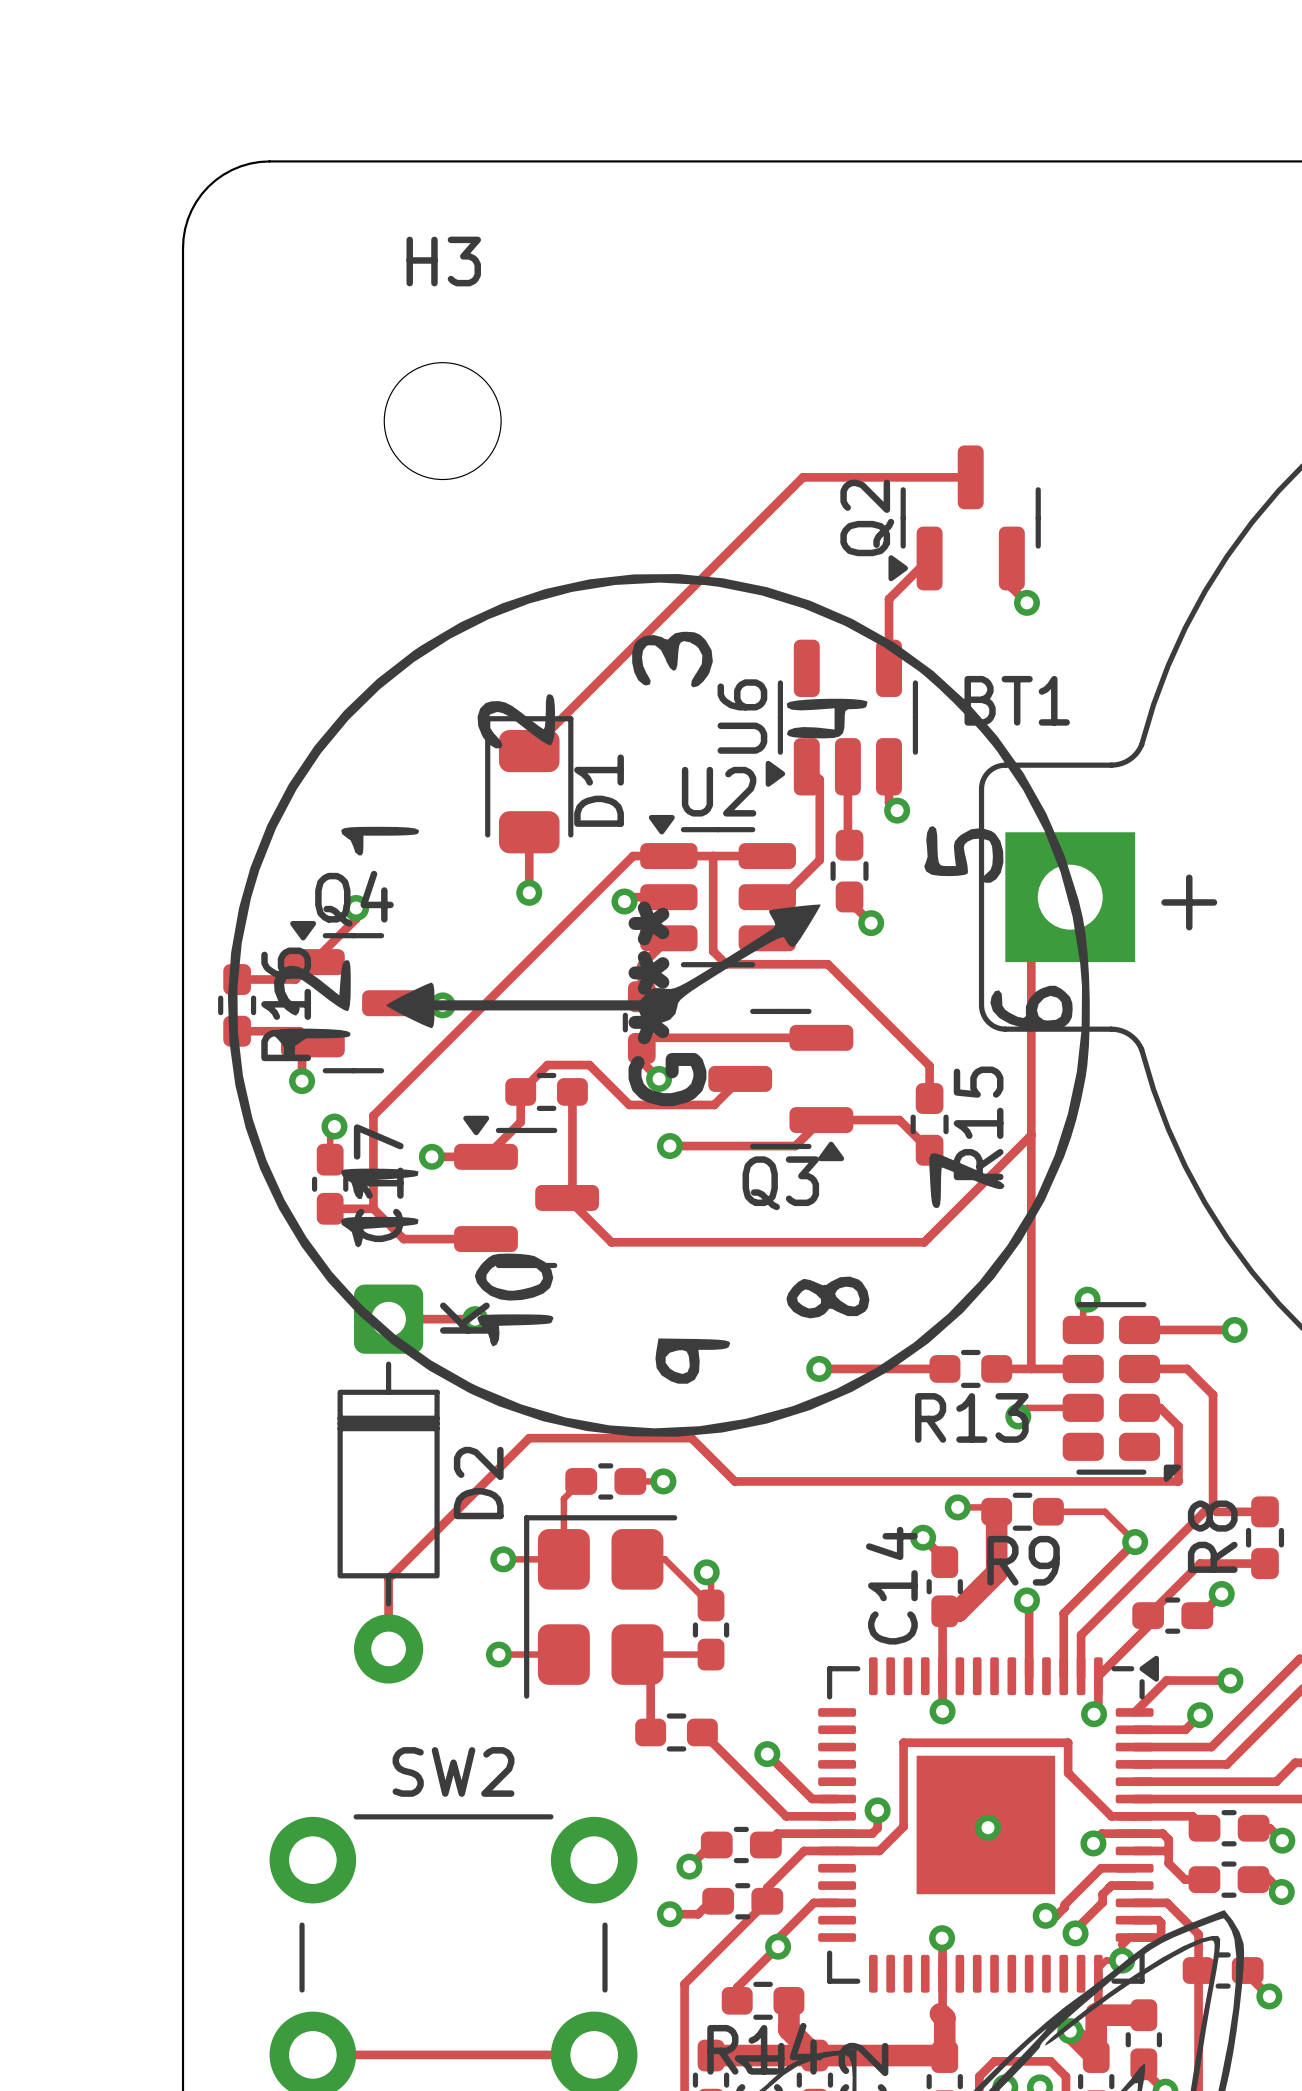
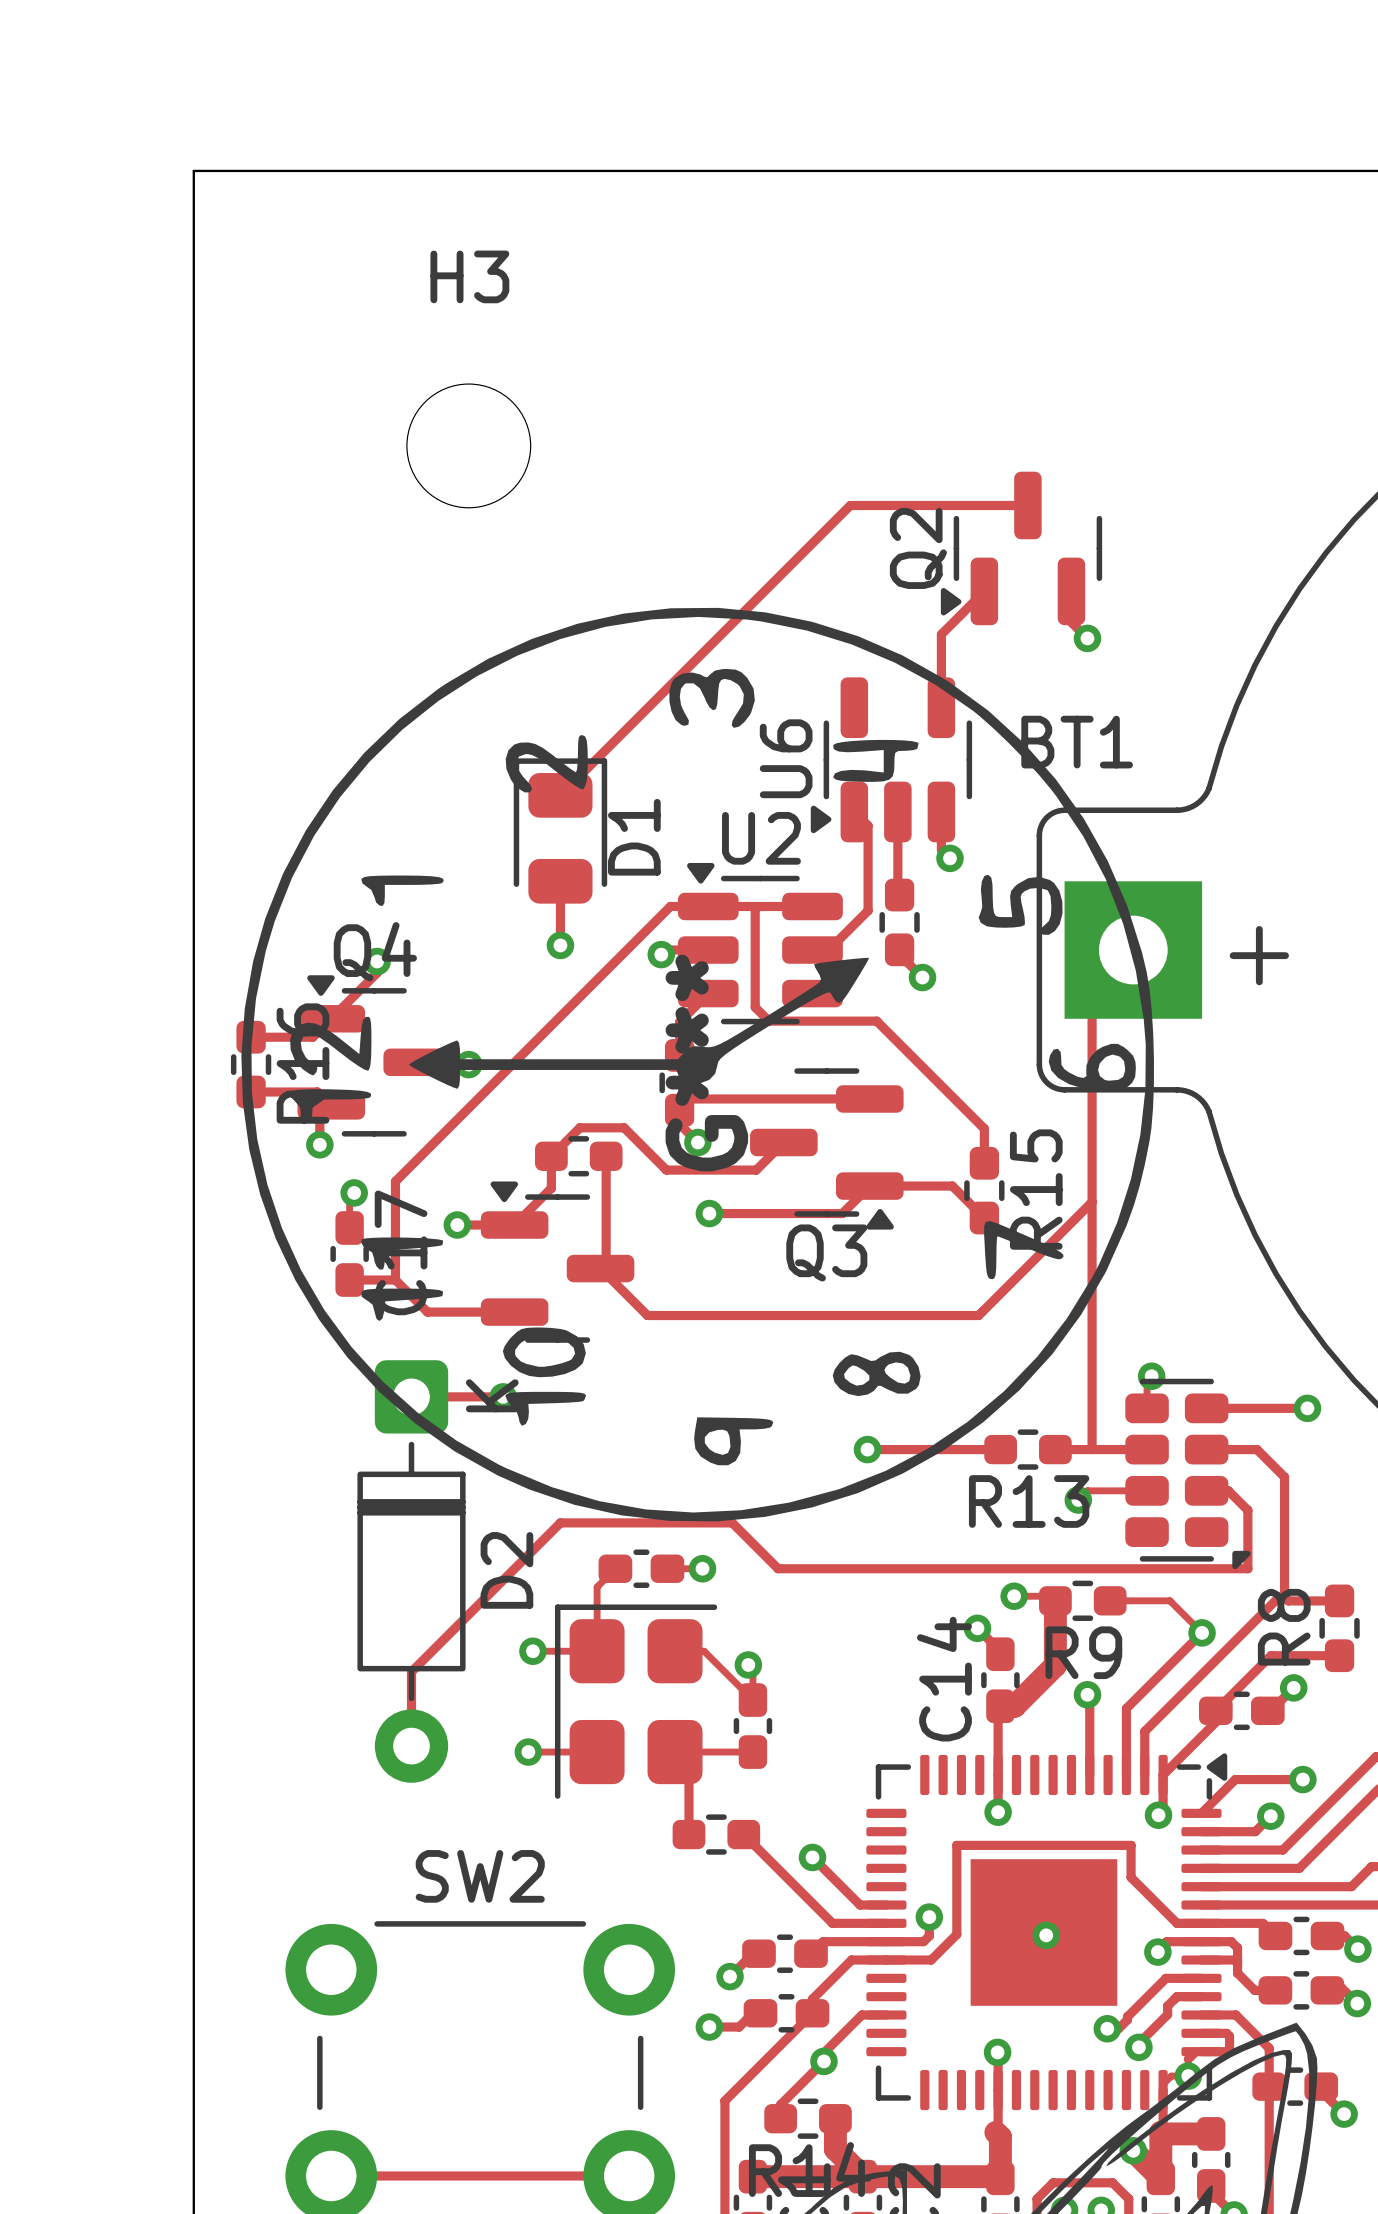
board edge: (269, 161) (250, 163) (232, 169) (208, 186) (191, 210) (185, 228) (183, 247) -> (285, 170) (193, 170) (193, 262)

